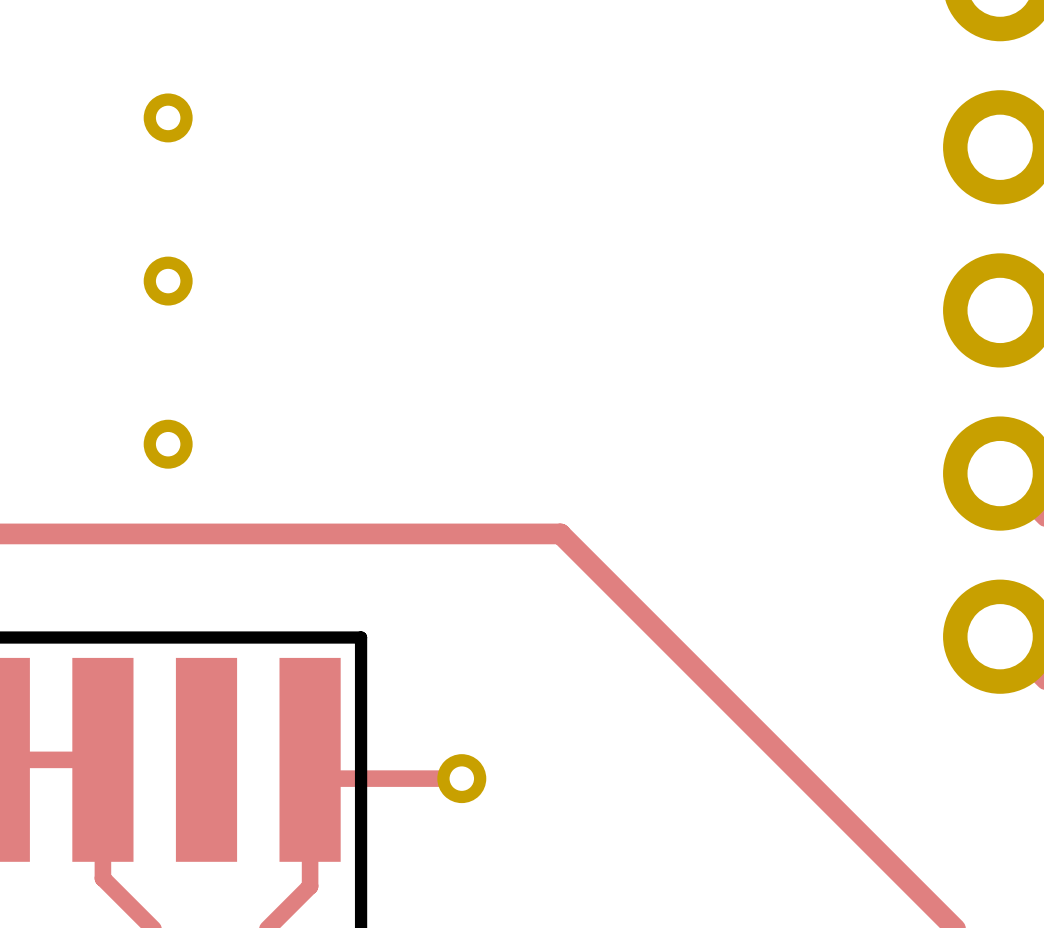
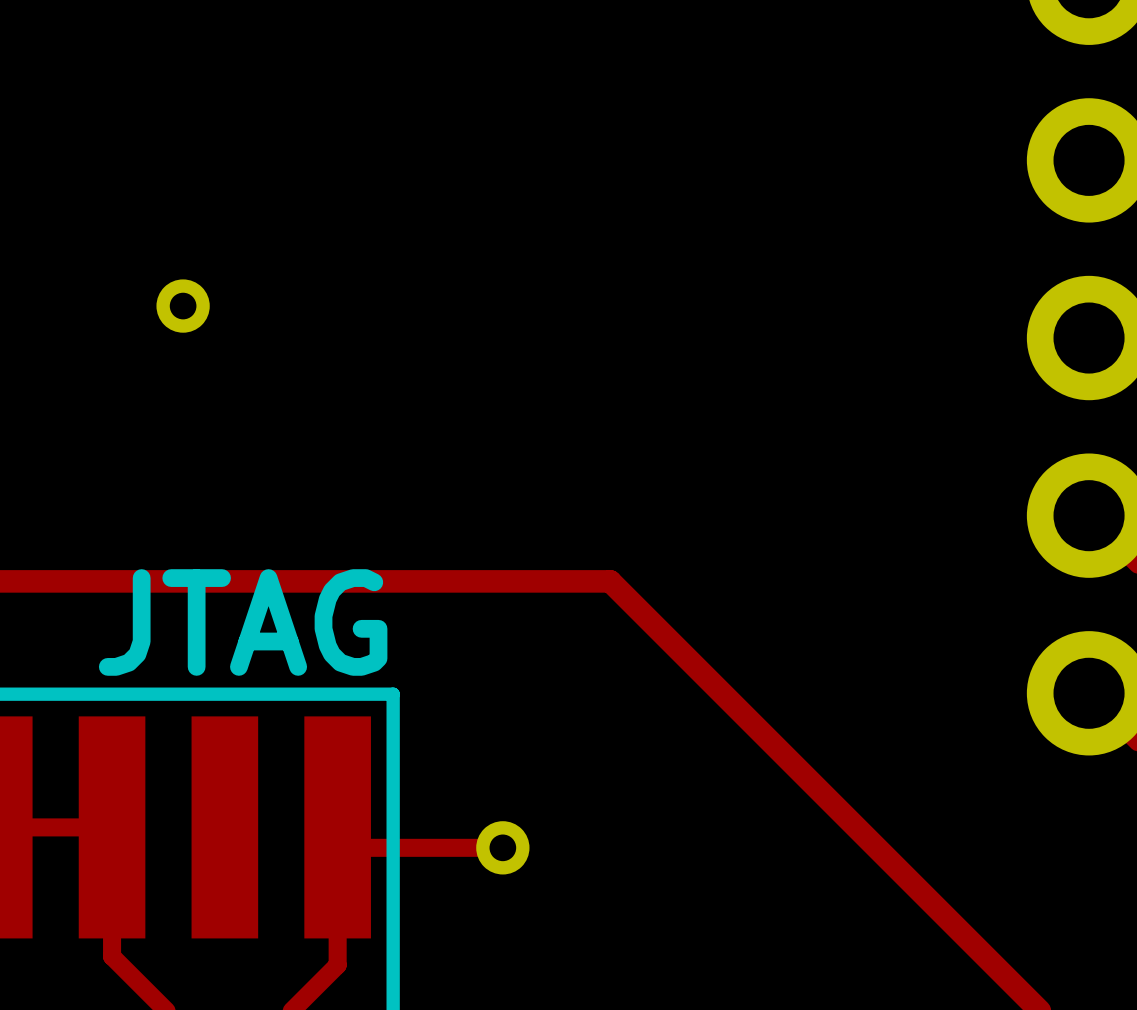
part: (168, 117) -> none
part: (168, 444) -> none
text: none -> JTAG (243, 622)

